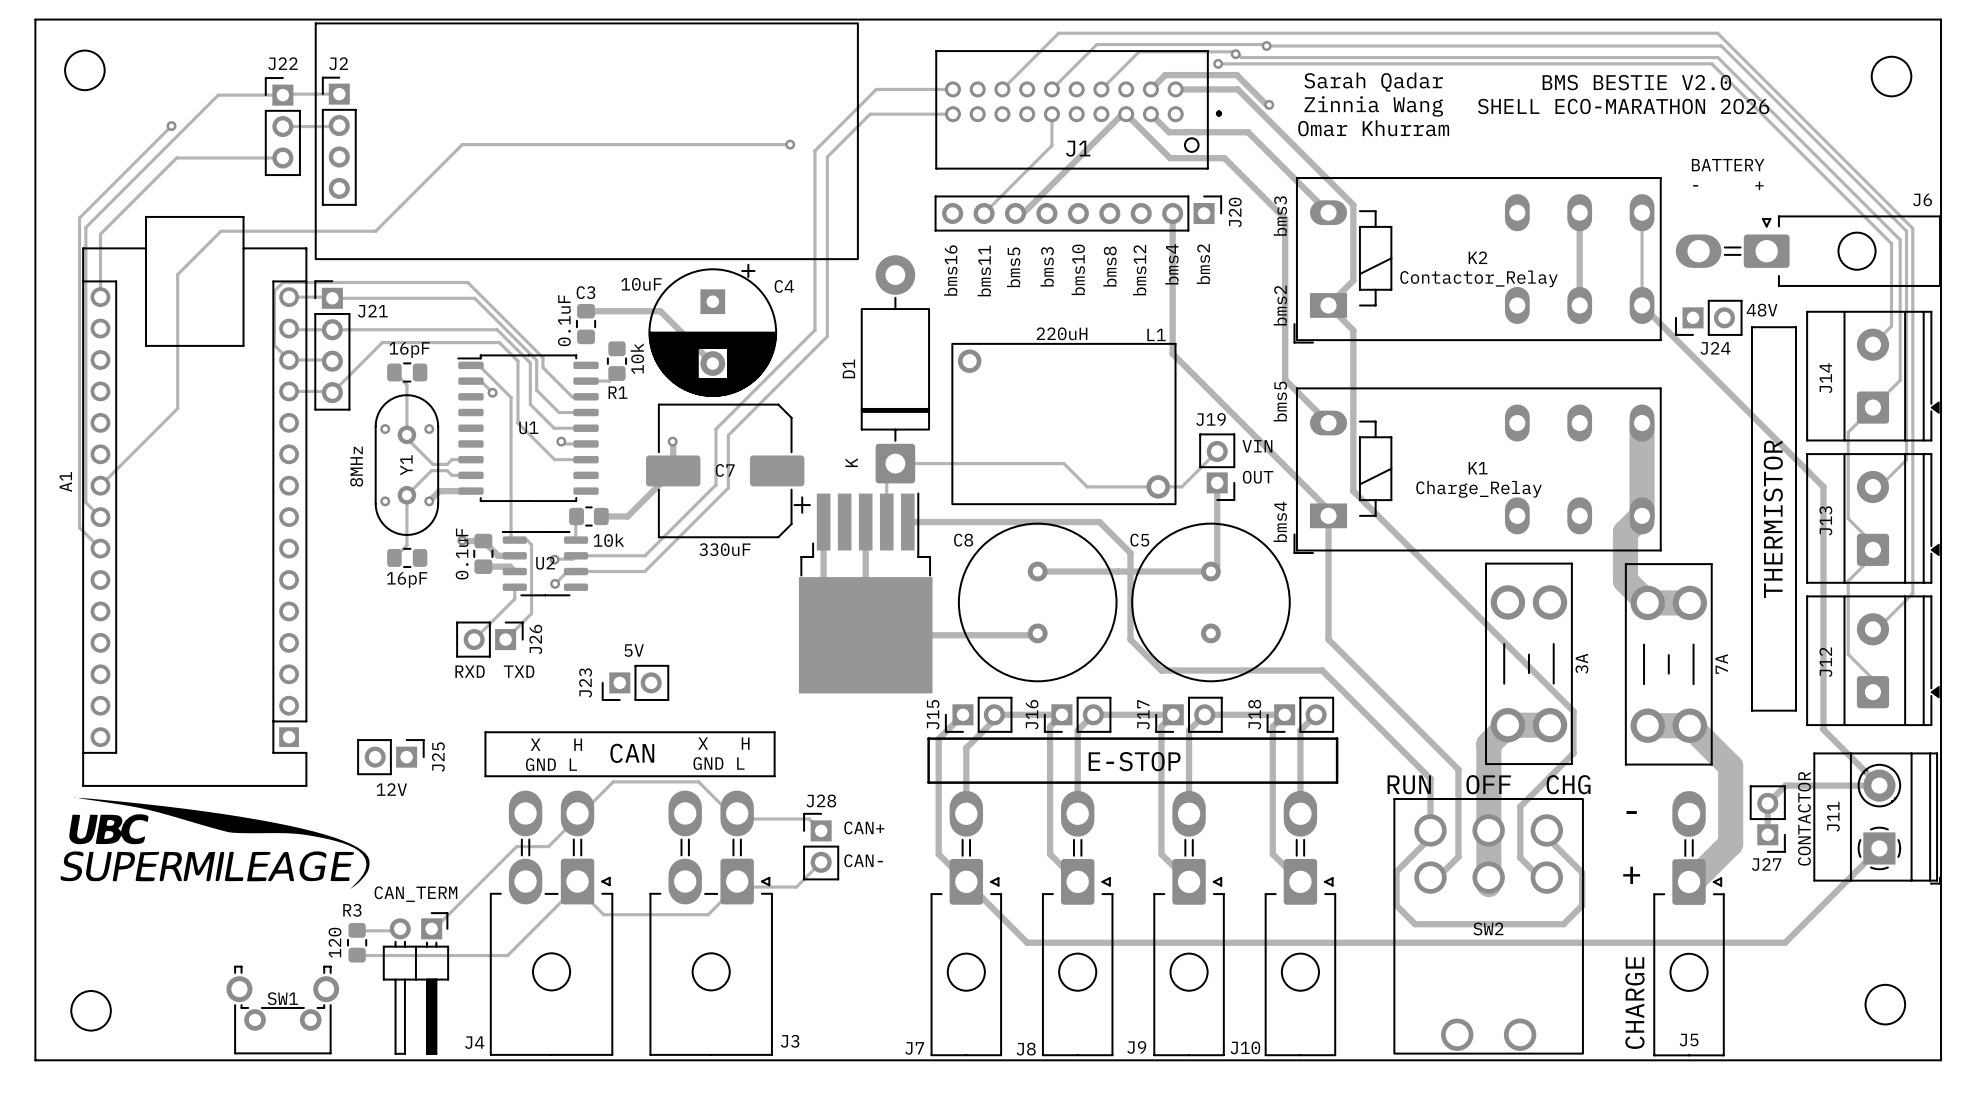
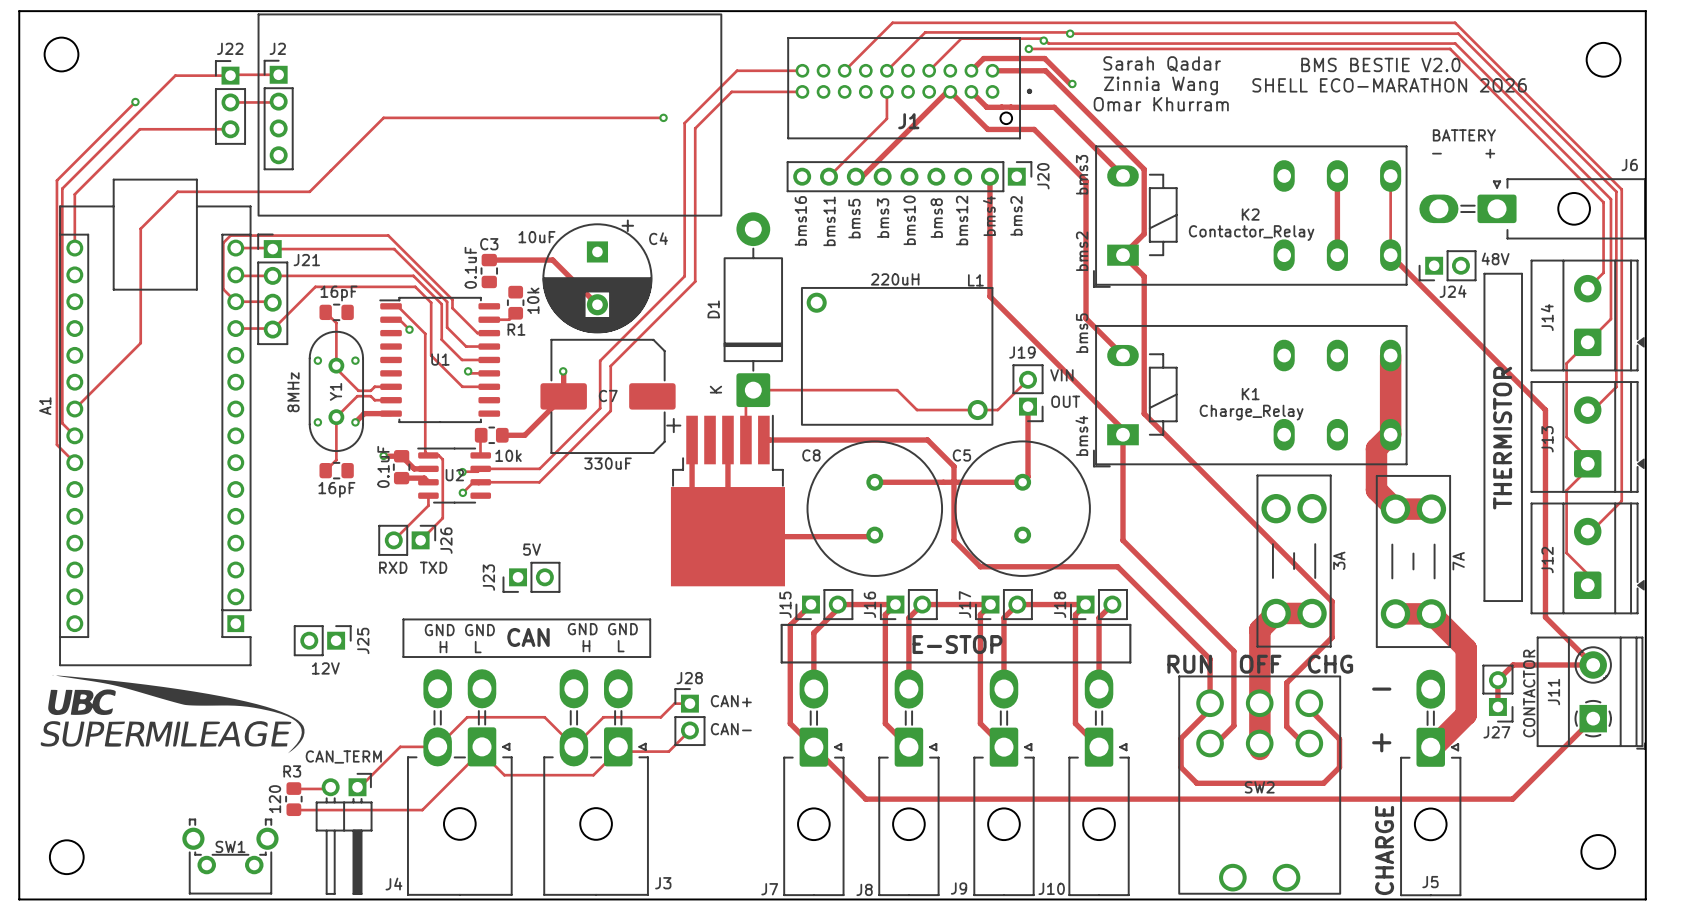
text: X H (723, 743) -> GND GND (602, 629)
text: X H (556, 744) -> GND GND (459, 630)
text: GND L (718, 763) -> H L (603, 646)
text: GND L (551, 764) -> H L (460, 647)
track: (821, 830) (809, 819) (735, 819) (698, 781) (613, 781) (548, 846) (516, 846) (481, 881) -> (689, 703) (674, 703) (660, 717) (603, 717) (573, 746) (544, 717) (467, 717) (437, 746) (400, 746)

